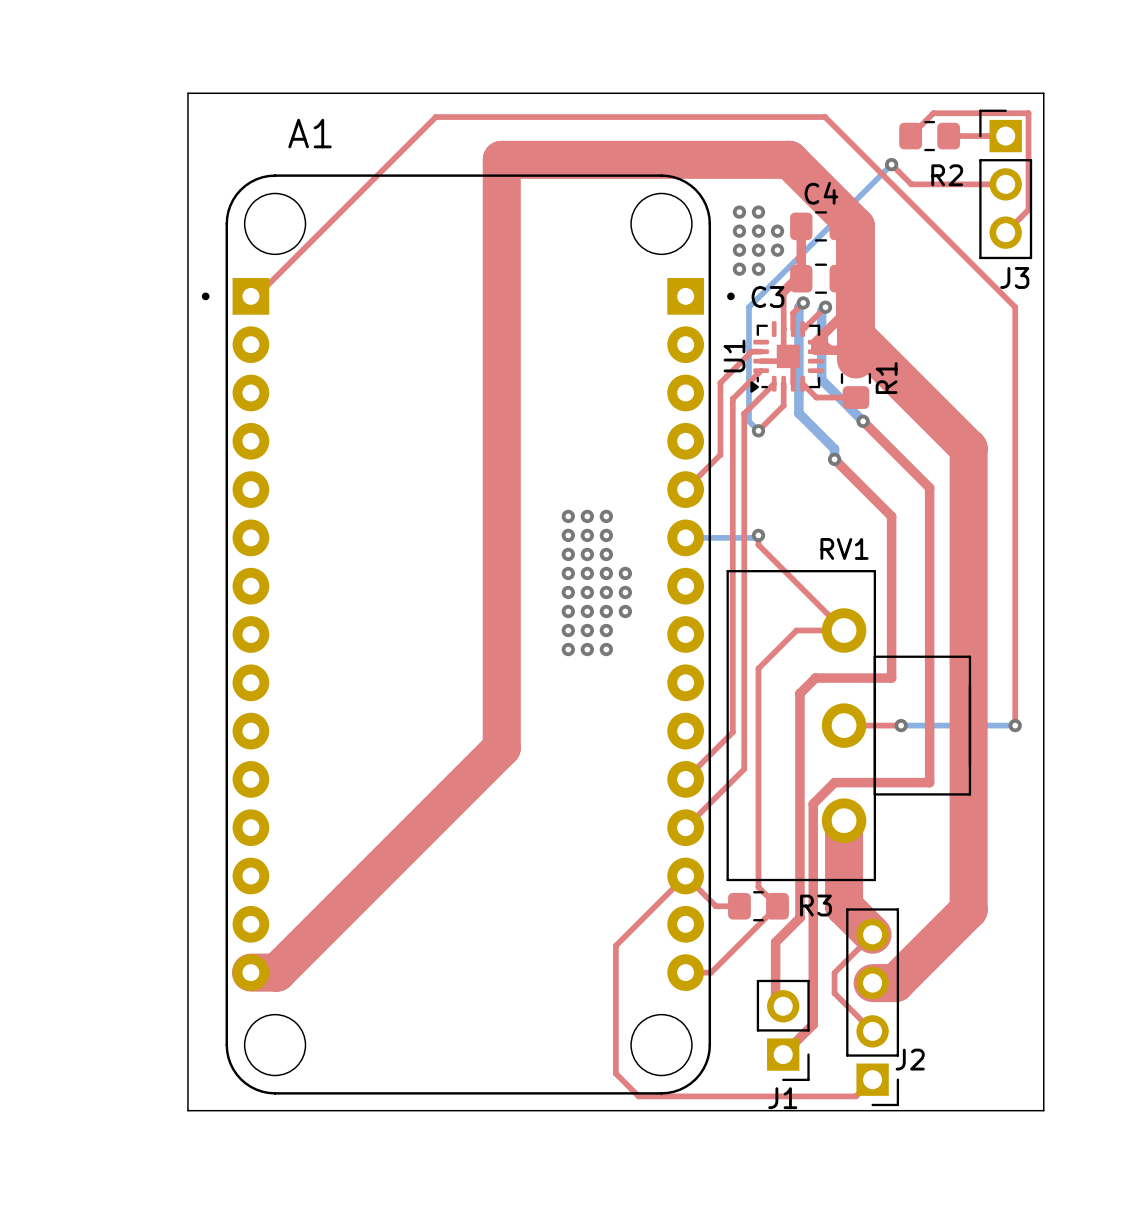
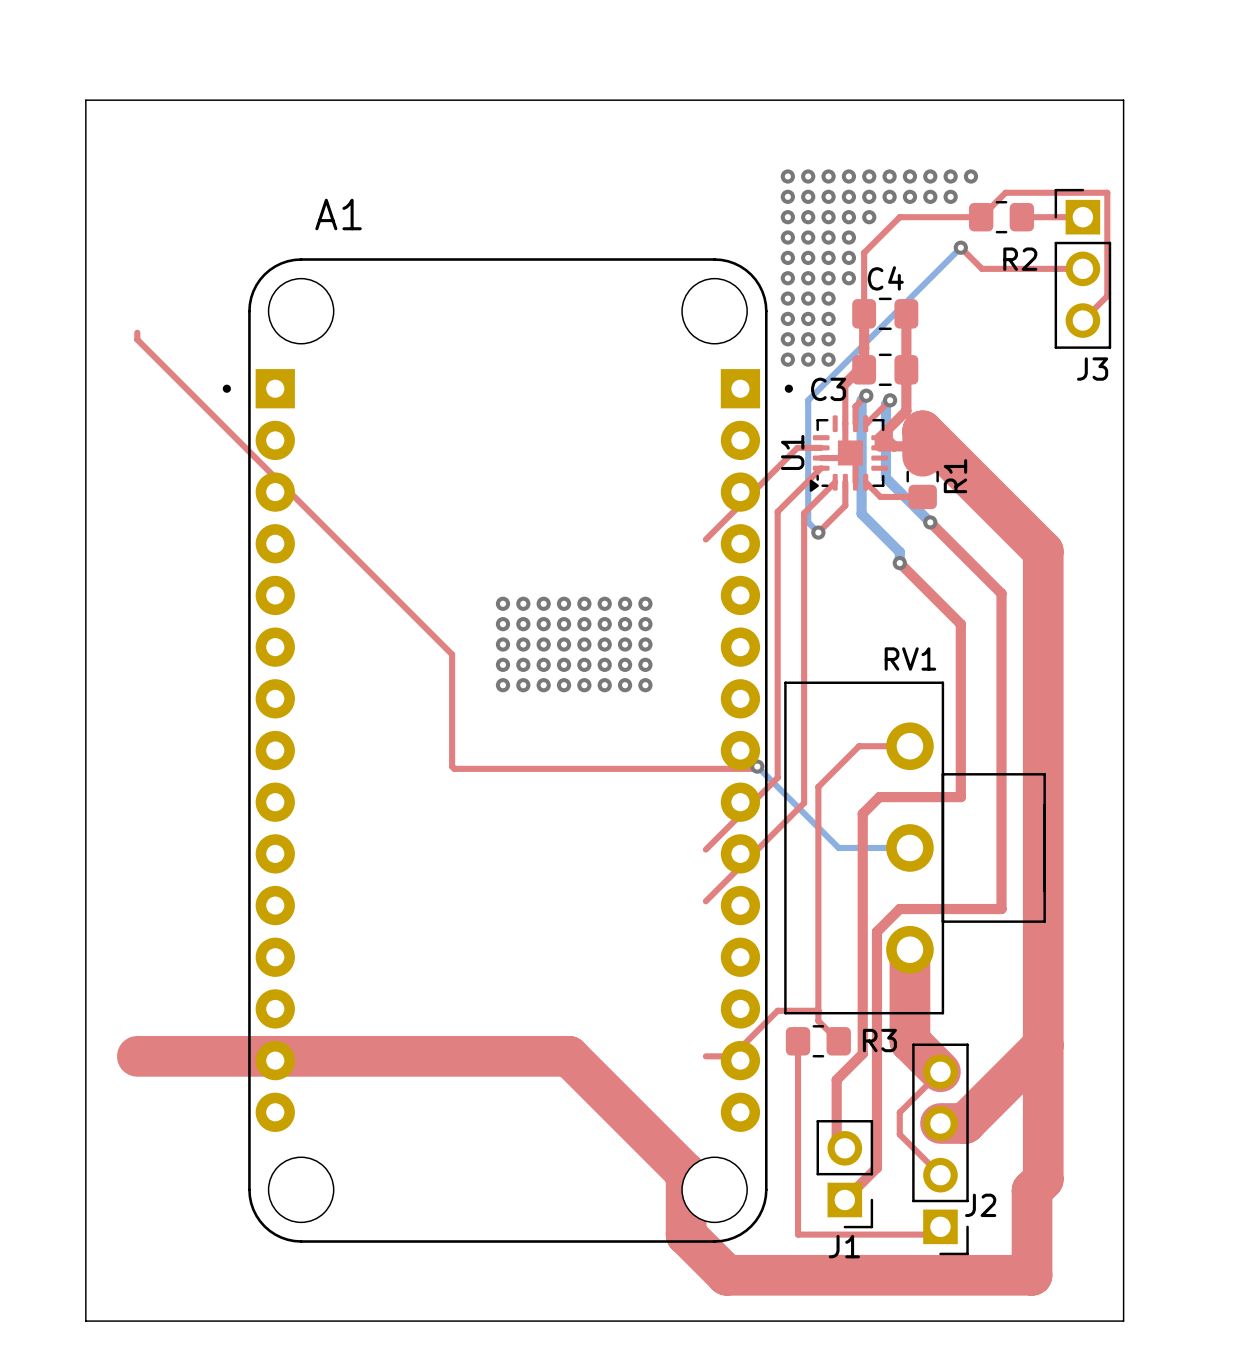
board edge: (1043, 93) (187, 93) (187, 1110) (1043, 1110) -> (1123, 171) (1123, 100) (85, 100) (85, 1321) (1123, 1321) (1123, 1260)
via: none -> (787, 176)
via: none -> (808, 176)
via: none -> (828, 176)
via: none -> (848, 176)
via: none -> (869, 176)
via: none -> (889, 176)
via: none -> (909, 176)
via: none -> (930, 176)
via: none -> (950, 176)
via: none -> (970, 176)
via: none -> (787, 196)
via: none -> (808, 196)
via: none -> (828, 196)
via: none -> (848, 196)
via: none -> (869, 196)
via: none -> (889, 196)
via: none -> (909, 196)
via: none -> (930, 196)
via: none -> (950, 196)
via: none -> (787, 217)
via: none -> (808, 217)
via: none -> (828, 217)
via: none -> (848, 217)
via: none -> (869, 217)
top track: none -> (981, 217) (899, 217) (864, 252) (864, 313)
via: none -> (787, 237)
via: none -> (808, 237)
via: none -> (828, 237)
via: none -> (848, 237)
via: none -> (787, 257)
via: none -> (808, 257)
via: none -> (828, 257)
via: none -> (848, 257)
via: none -> (787, 278)
via: none -> (808, 278)
via: none -> (828, 278)
via: none -> (848, 278)
via: none -> (787, 298)
via: (739, 212) -> none
via: none -> (808, 298)
via: (758, 212) -> none
via: none -> (828, 298)
via: none -> (787, 318)
via: (739, 231) -> none
via: none -> (808, 318)
via: (758, 231) -> none
via: none -> (828, 318)
via: (777, 231) -> none
top track: none -> (137, 332) (137, 339) (452, 654) (452, 766) (454, 768) (755, 768) (757, 765)
via: none -> (787, 339)
via: (739, 250) -> none
via: none -> (808, 339)
via: (758, 250) -> none
via: none -> (828, 339)
via: (777, 250) -> none
via: none -> (787, 359)
via: (739, 269) -> none
via: none -> (808, 359)
via: (758, 269) -> none
via: none -> (828, 359)
top track: (250, 296) (256, 296) (435, 117) (825, 117) (1015, 307) (1015, 725) -> none
top track: (855, 335) (855, 226) (789, 159) (501, 159) (501, 747) (276, 972) (250, 972) -> none
top track: (751, 351) (720, 382) (720, 411) -> (790, 498) (777, 511)
top track: none -> (811, 447) (797, 447) (705, 539)
top track: (732, 398) (732, 732) (685, 779) -> none
top track: (745, 412) (744, 769) (685, 827) -> (804, 513) (804, 803) (705, 901)
top track: (720, 454) (685, 489) -> (777, 558) (777, 777) (705, 849)
via: none -> (502, 603)
via: none -> (523, 603)
via: none -> (543, 603)
via: none -> (564, 603)
via: none -> (584, 603)
via: none -> (604, 603)
via: none -> (625, 603)
via: none -> (645, 603)
via: none -> (502, 624)
via: none -> (523, 624)
via: none -> (543, 624)
via: none -> (564, 624)
via: none -> (584, 624)
via: none -> (604, 624)
via: (568, 516) -> none
via: none -> (625, 624)
via: (587, 516) -> none
via: none -> (645, 624)
via: (606, 516) -> none
via: none -> (502, 644)
via: none -> (523, 644)
via: none -> (543, 644)
via: none -> (564, 644)
via: none -> (584, 644)
via: none -> (604, 644)
via: (568, 535) -> none
via: none -> (625, 644)
via: (587, 535) -> none
via: none -> (645, 644)
via: (606, 535) -> none
top track: (758, 535) (758, 544) (844, 630) -> none
bottom track: (758, 535) (756, 537) (685, 537) -> none
via: (758, 535) -> none
via: none -> (502, 664)
via: none -> (523, 664)
via: none -> (543, 664)
via: none -> (564, 664)
via: none -> (584, 664)
via: none -> (604, 664)
via: (568, 554) -> none
via: none -> (625, 664)
via: (587, 554) -> none
via: none -> (645, 664)
via: (606, 554) -> none
via: none -> (502, 685)
via: none -> (523, 685)
via: none -> (543, 685)
via: none -> (564, 685)
via: none -> (584, 685)
via: none -> (604, 685)
via: (568, 573) -> none
via: none -> (625, 685)
via: (587, 573) -> none
via: none -> (645, 685)
via: (606, 573) -> none
via: (625, 573) -> none
via: (568, 592) -> none
via: (587, 592) -> none
via: (606, 592) -> none
via: (625, 592) -> none
via: (568, 611) -> none
via: (587, 611) -> none
via: (606, 611) -> none
via: (625, 611) -> none
via: (568, 630) -> none
via: (587, 630) -> none
via: (606, 630) -> none
via: (568, 649) -> none
via: (587, 649) -> none
via: (606, 649) -> none
bottom track: none -> (757, 766) (838, 847) (909, 847)
via: none -> (757, 766)
top track: (844, 725) (901, 725) -> none
bottom track: (901, 725) (1015, 725) -> none
via: (901, 725) -> none
via: (1015, 725) -> none
top track: none -> (818, 1010) (777, 1010) (732, 1056) (705, 1056)
top track: (739, 906) (715, 906) (685, 876) (615, 945) (615, 1073) (638, 1096) (855, 1096) (865, 1086) -> (798, 1041) (798, 1234) (932, 1234)
top track: (777, 906) (711, 972) (685, 972) -> none
top track: none -> (1043, 1045) (1043, 1179) (1032, 1190) (1032, 1275) (726, 1275) (686, 1234) (686, 1173) (568, 1056) (137, 1056)

